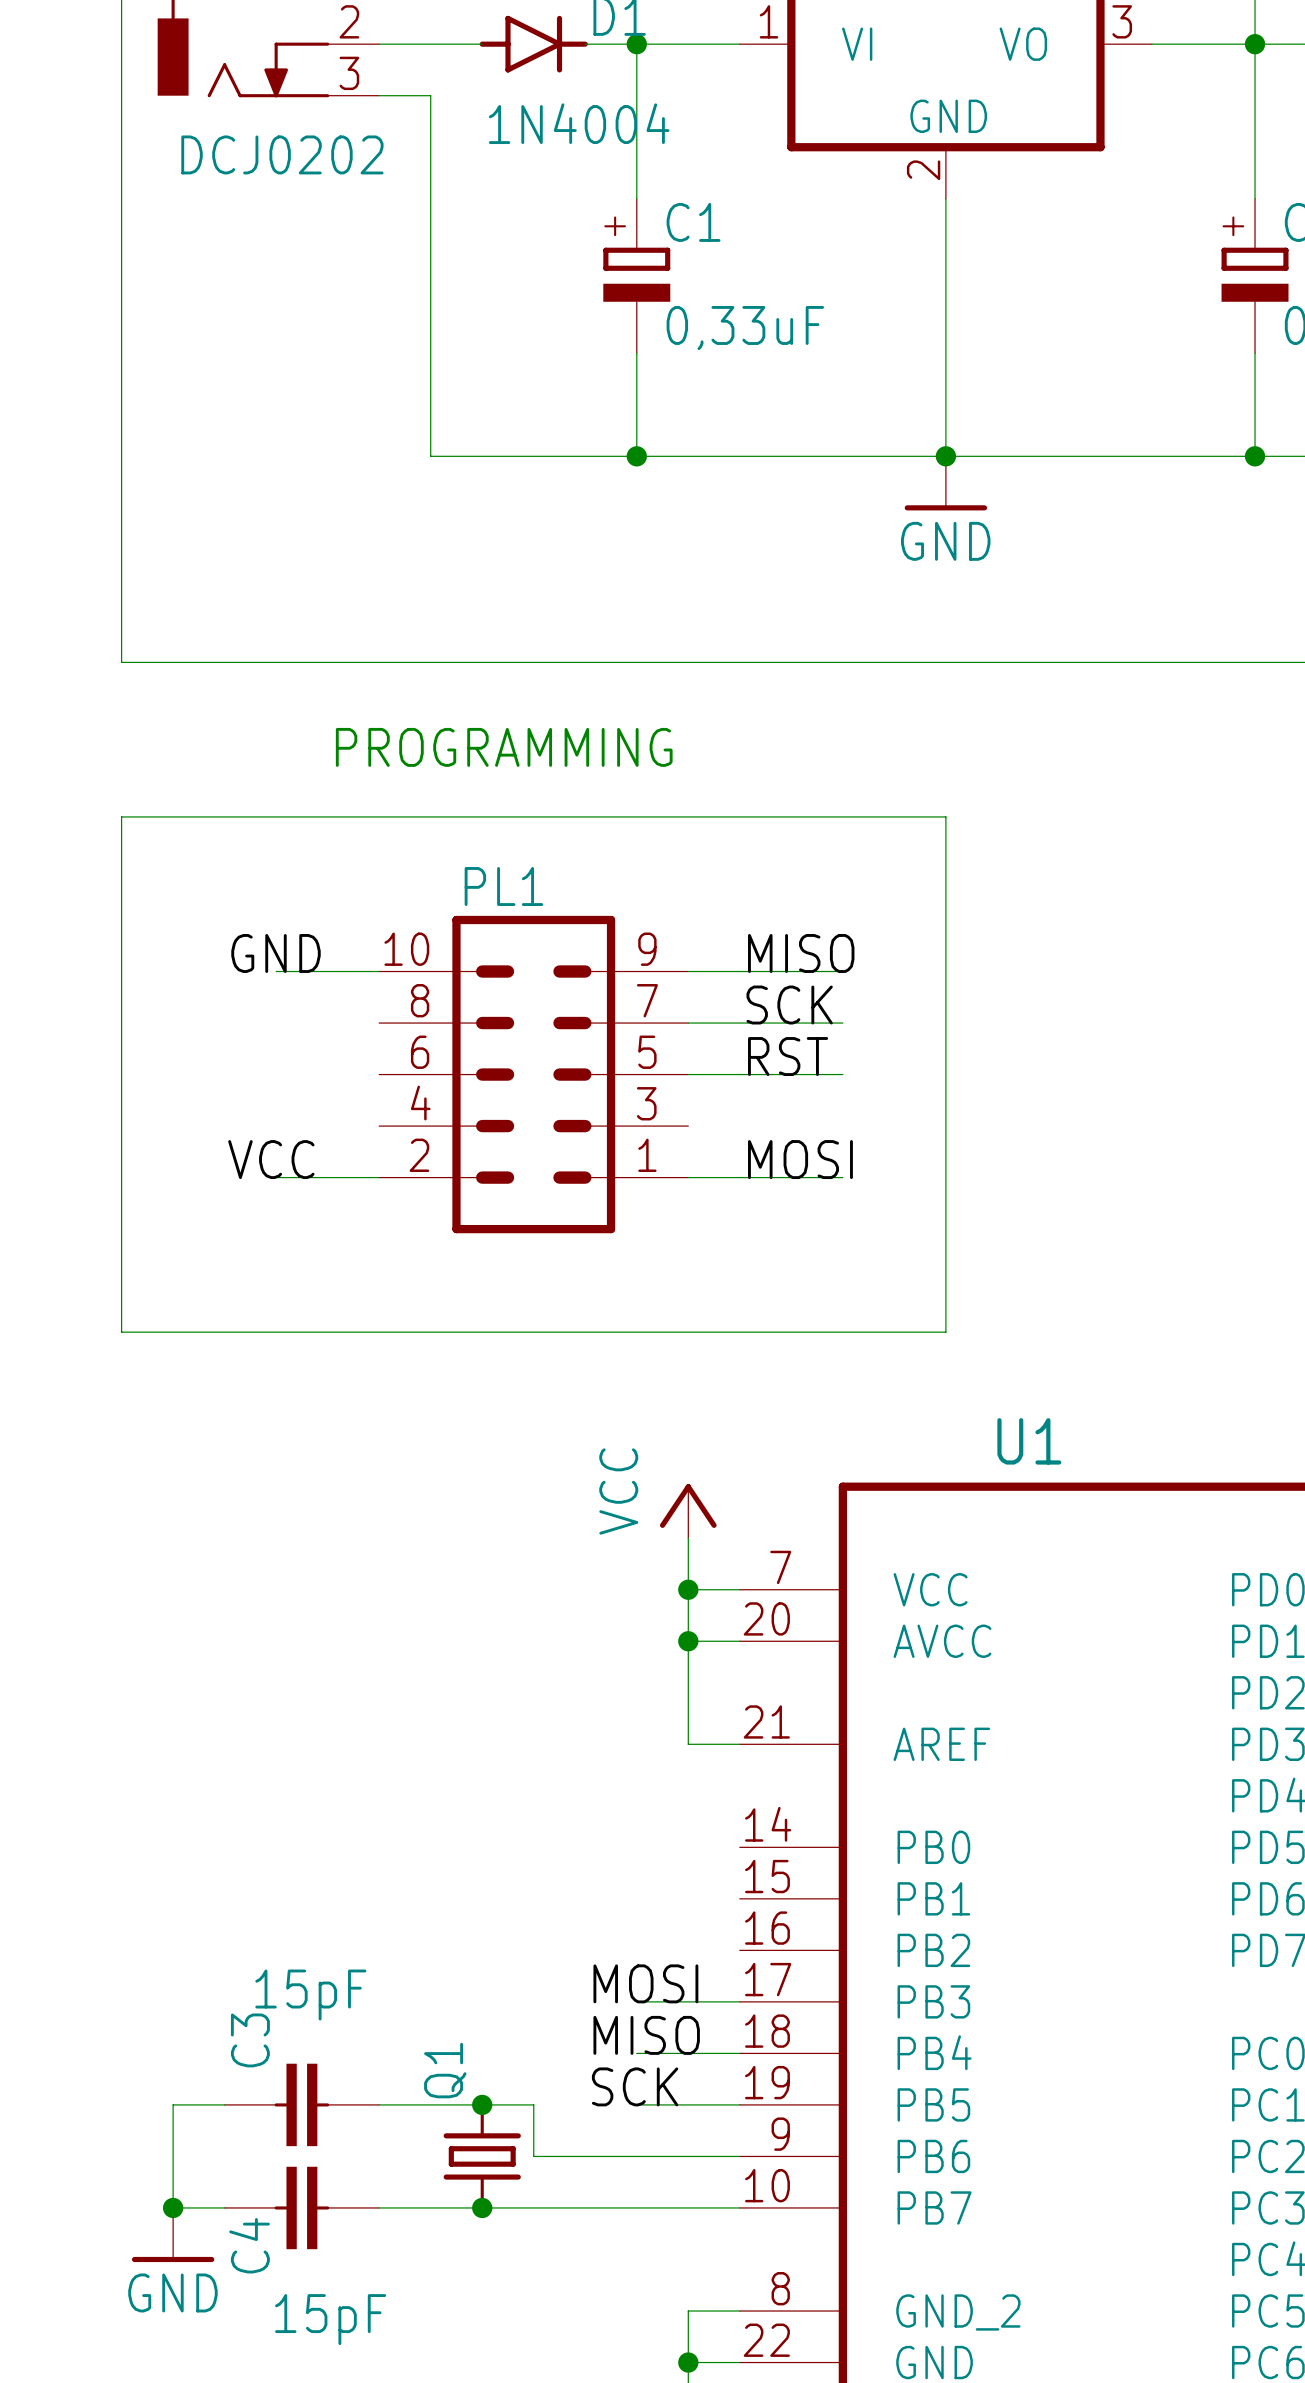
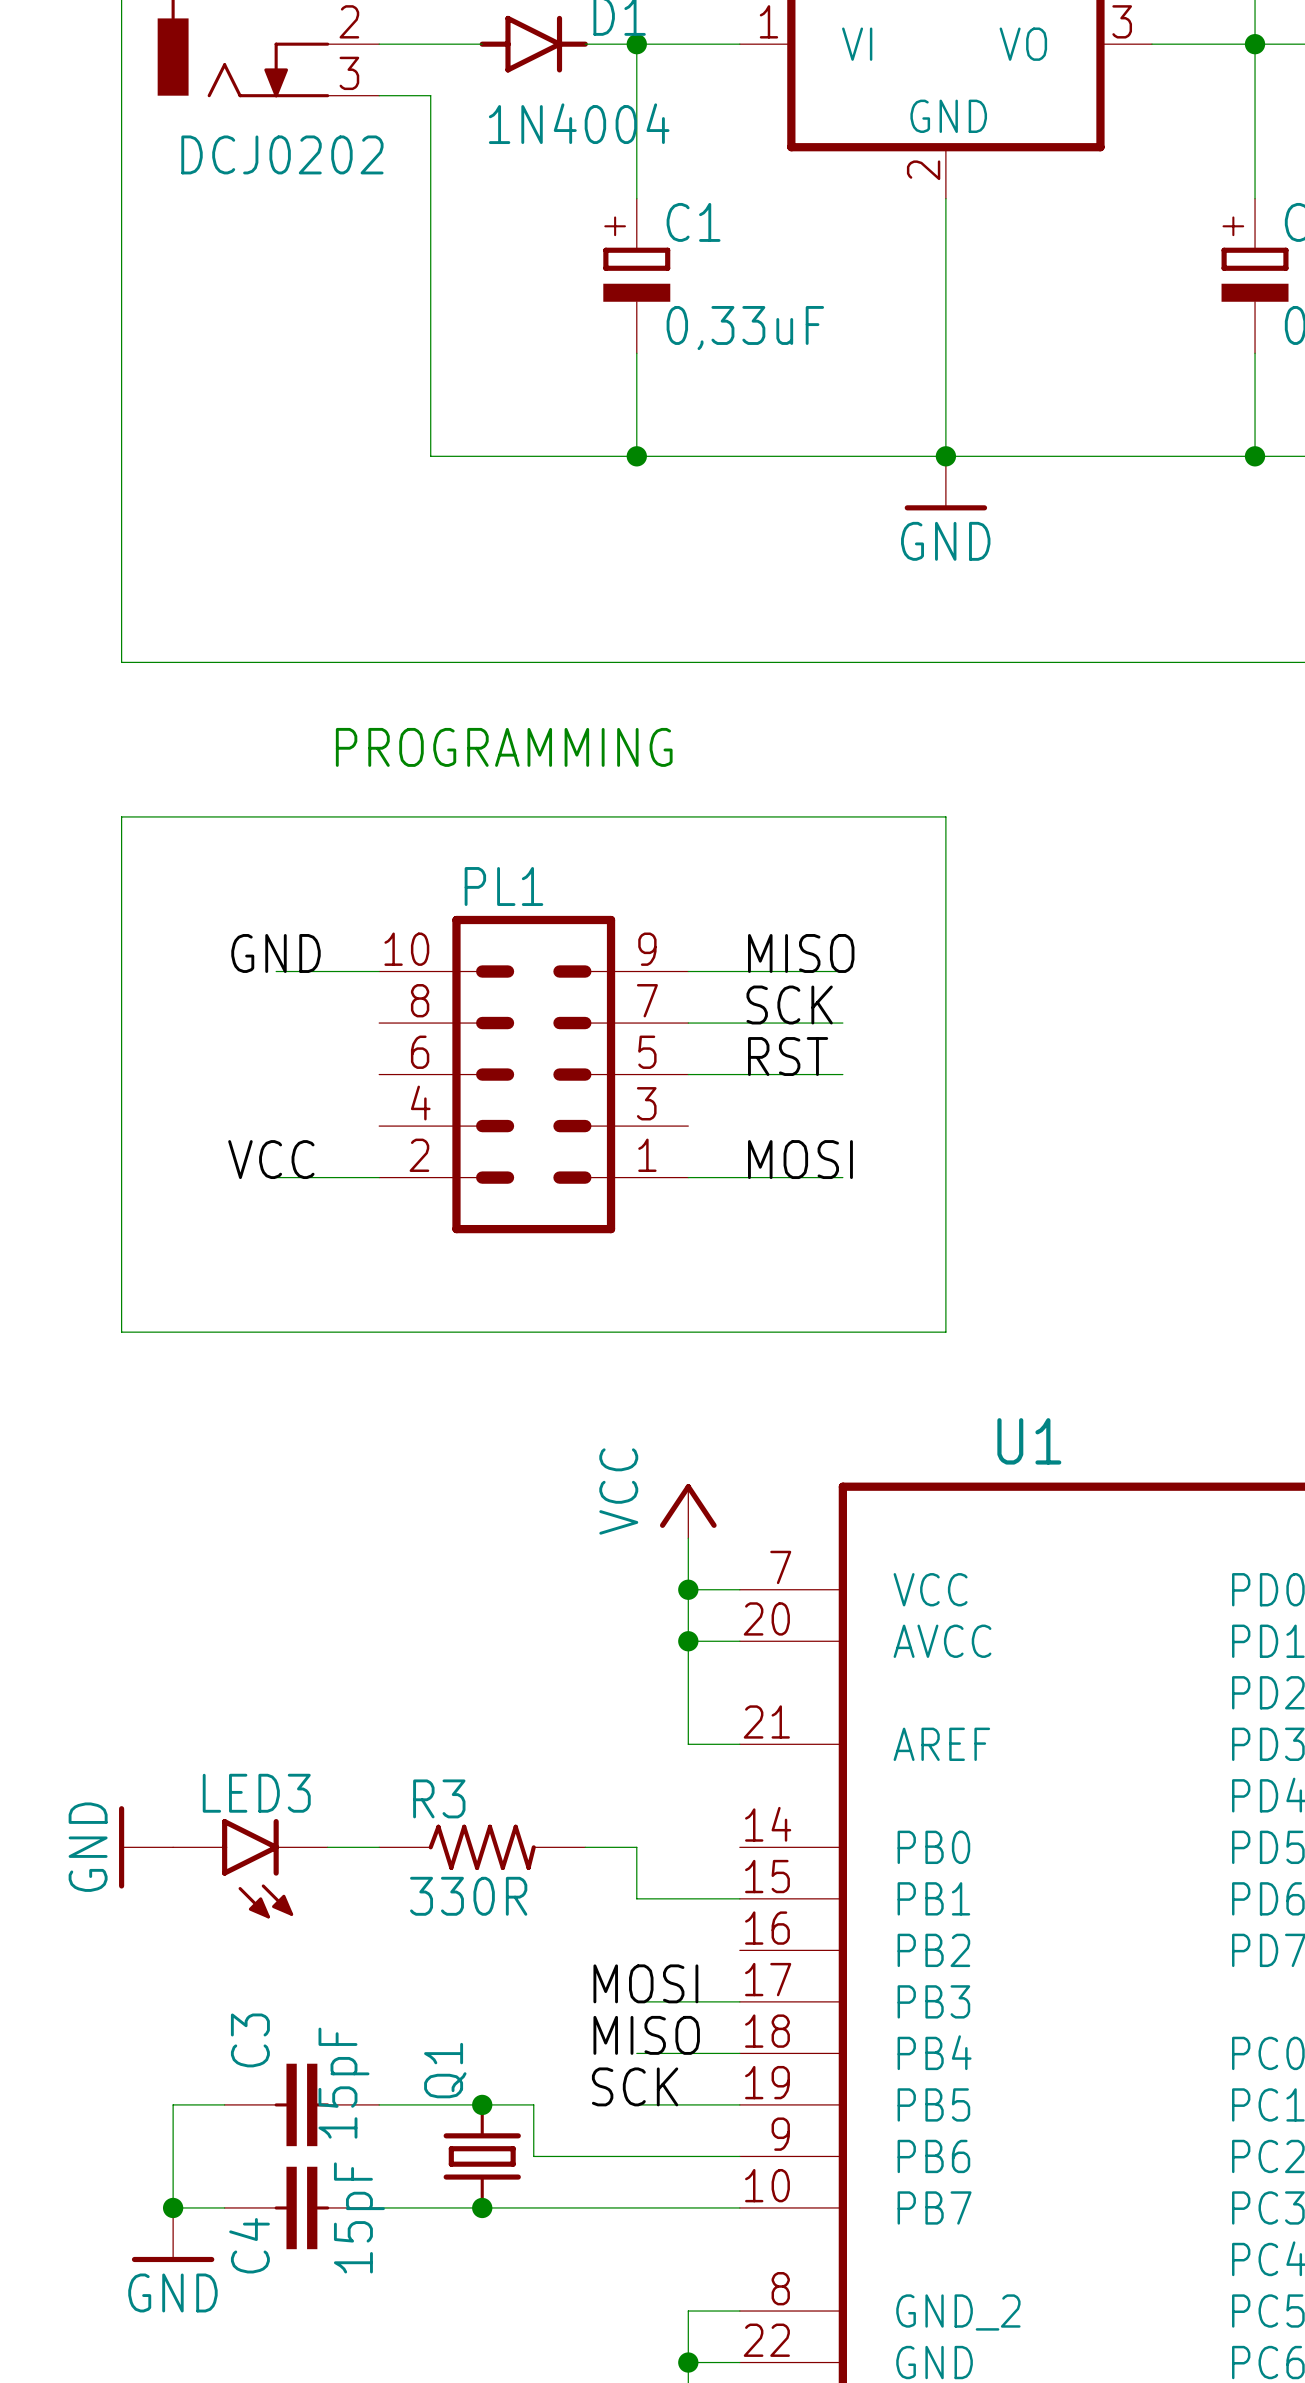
power symbol: none -> GND (146, 1847)
wire: none -> (327, 1847) (379, 1847)
R3: none -> 330R (482, 1847)
wire: none -> (585, 1847) (636, 1847) (636, 1898) (739, 1898)
LED3: none -> (250, 1868)
C3 value rotation: 0° (310, 1995) -> 90° counterclockwise (343, 2083)
C4 value rotation: 0° (330, 2319) -> 90° counterclockwise (359, 2217)

